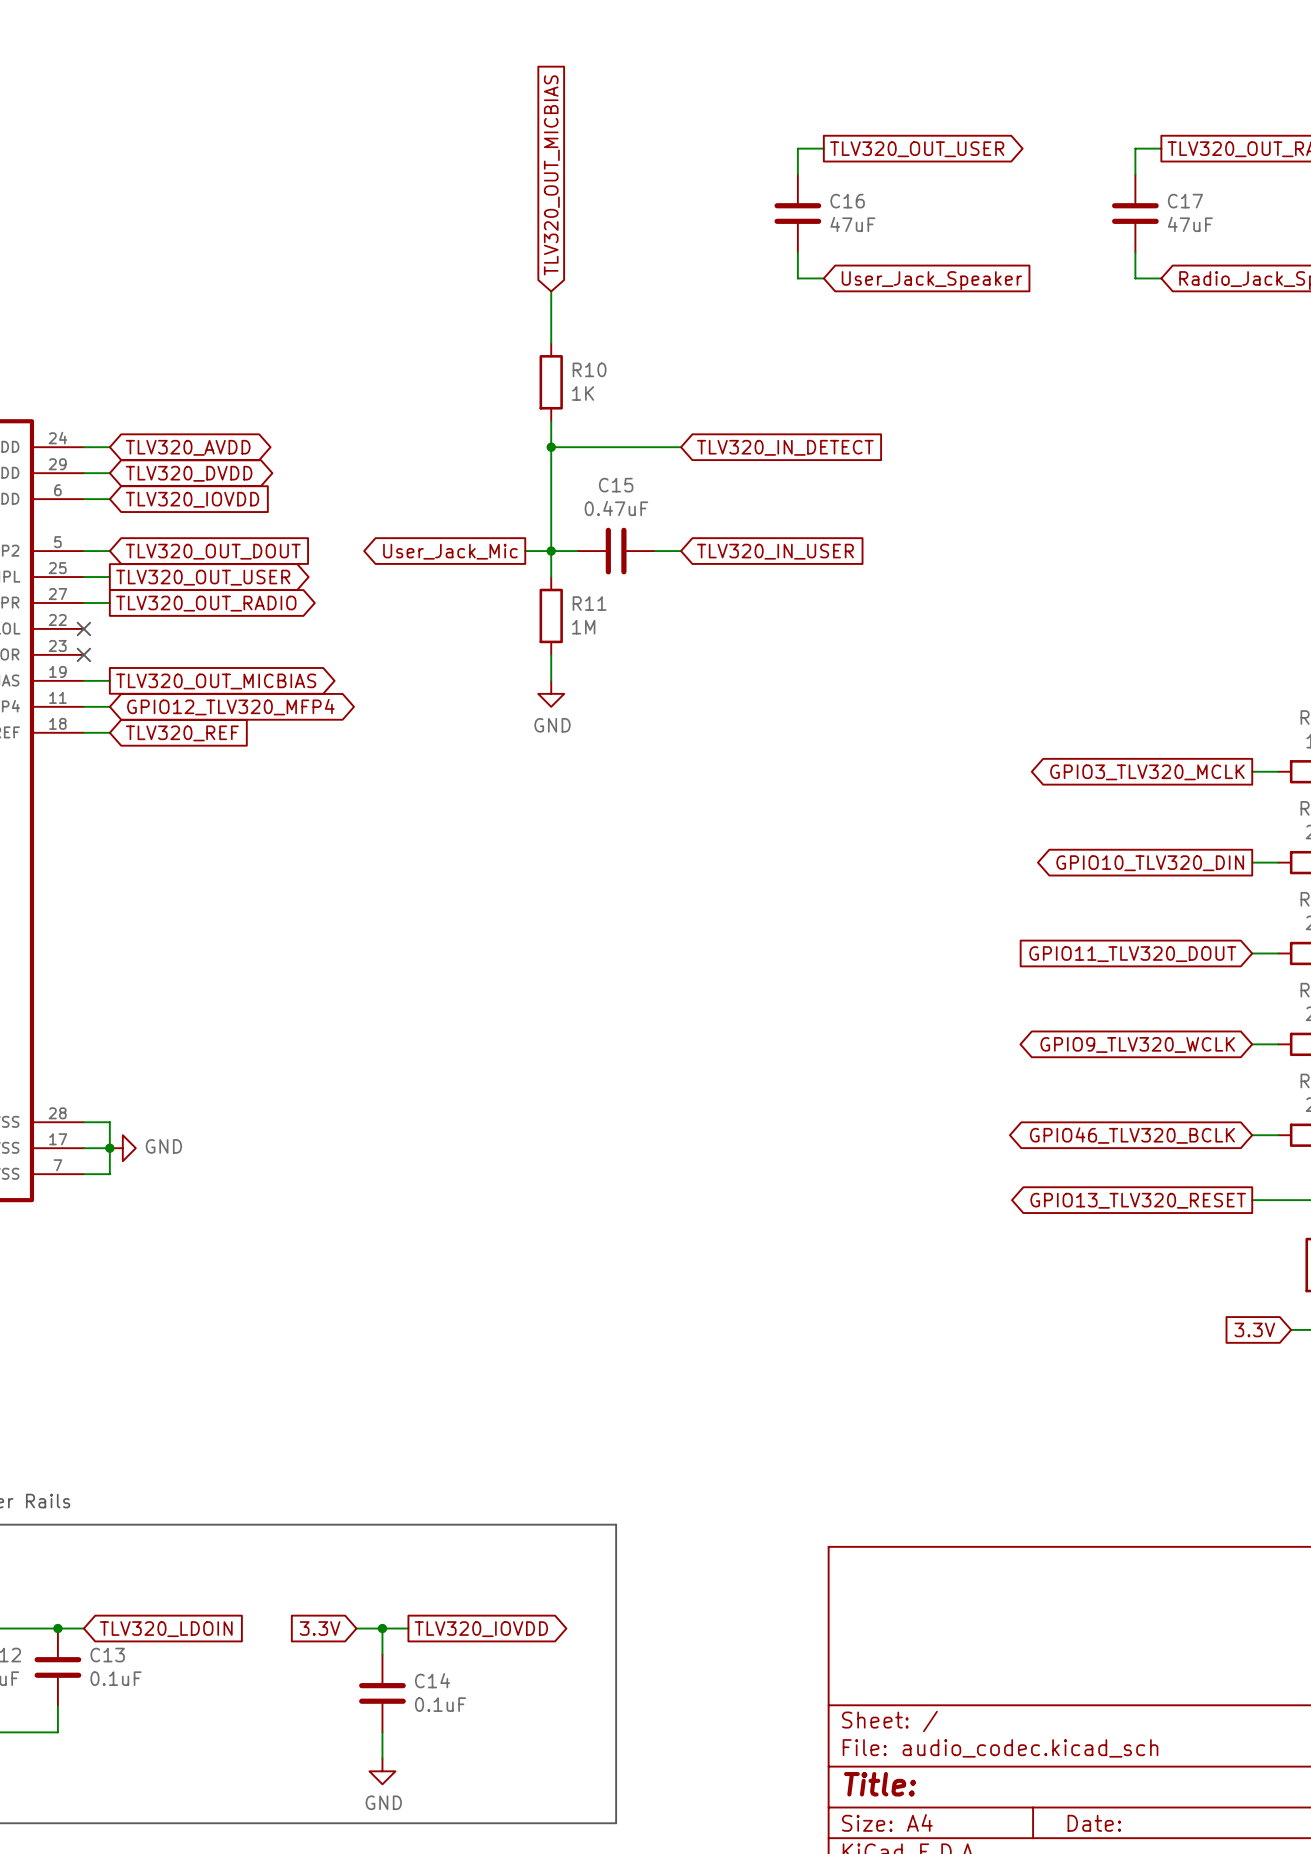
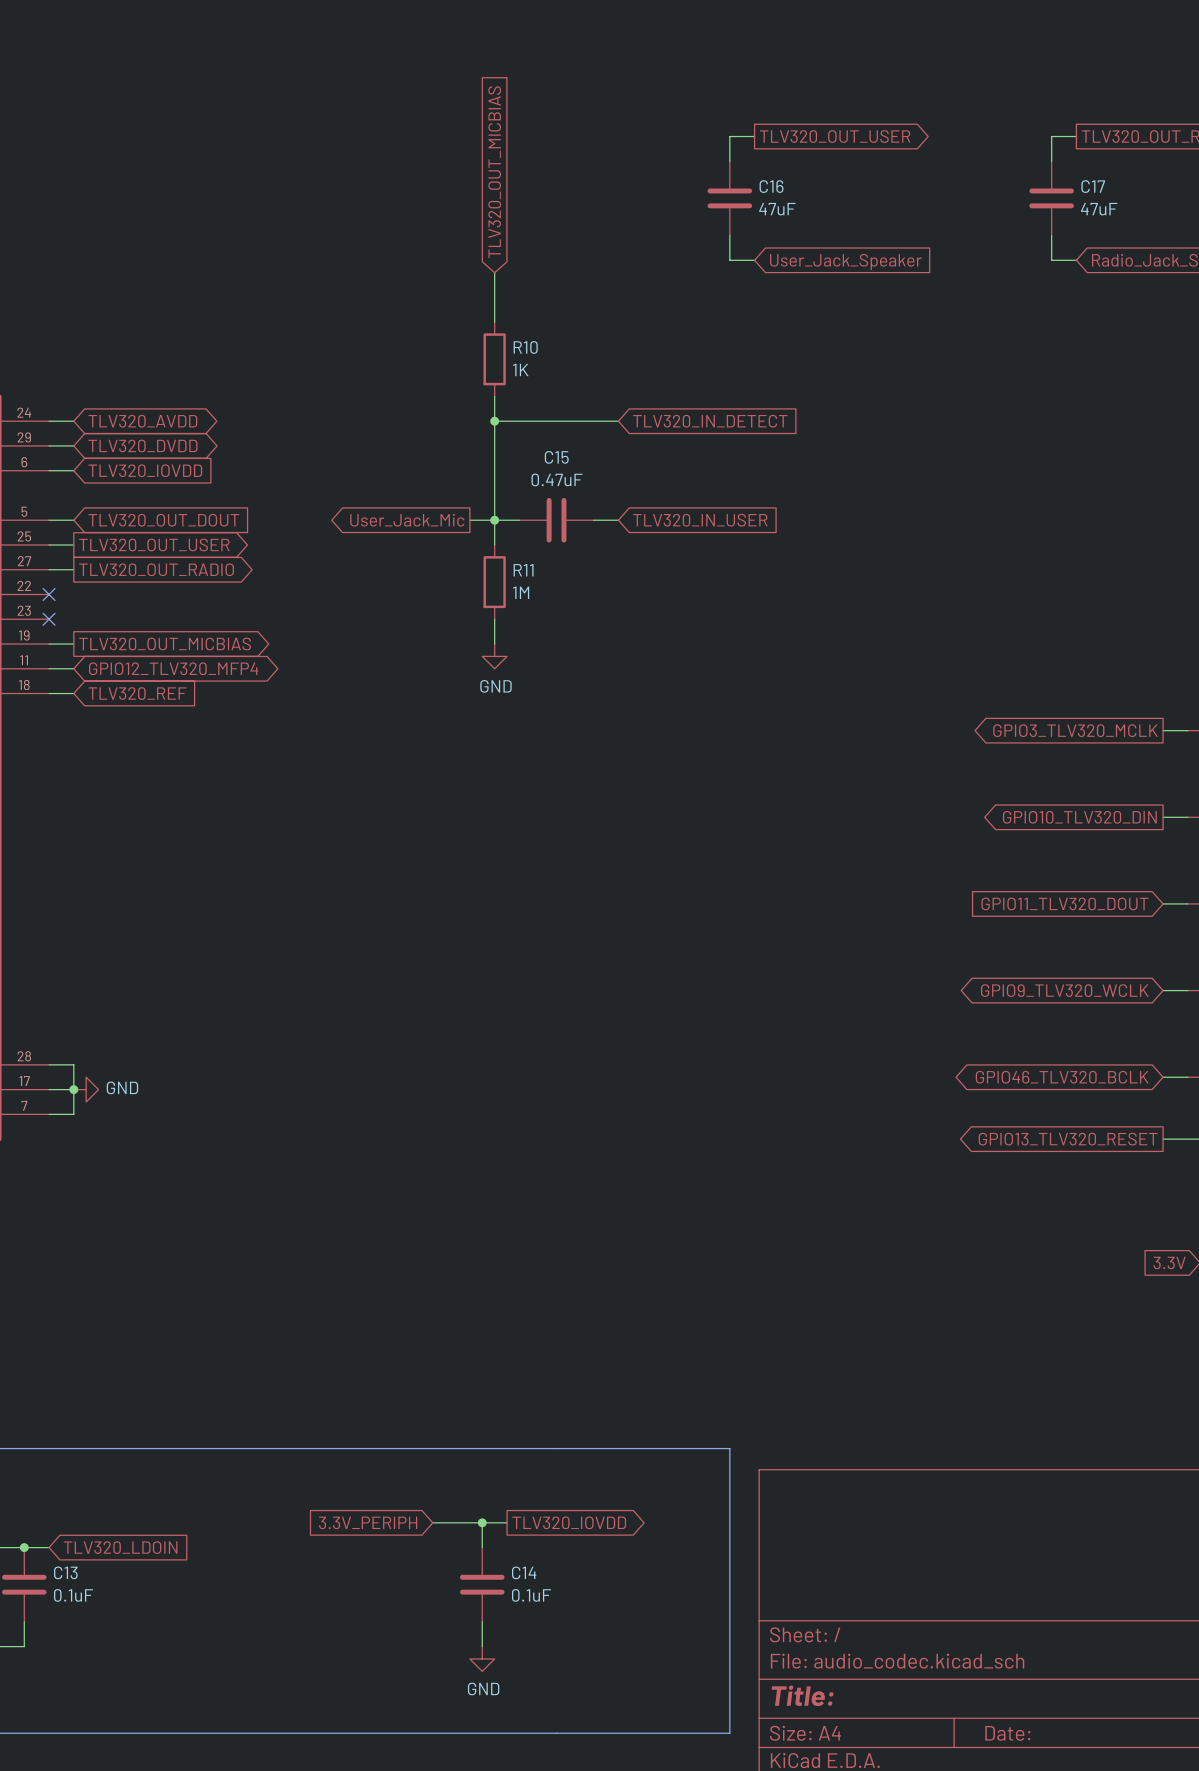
line: (616, 1524) (616, 1823) -> (556, 1448) (729, 1448) (729, 1733) (556, 1733)
wire: none -> (432, 1522) (507, 1522)
junction: none -> (482, 1522)
global label: none -> 3.3V_PERIPH (368, 1522)
global label: 3.3V (320, 1628) -> none
wire: (356, 1628) (408, 1628) -> none
wire: (382, 1628) (382, 1654) -> (482, 1522) (482, 1547)
junction: (382, 1628) -> none
global label position: TLV320_IOVDD (481, 1629) -> TLV320_IOVDD (569, 1522)
C14 position: (382, 1693) -> (482, 1584)
wire: (382, 1732) (382, 1758) -> (482, 1621) (482, 1646)
power symbol position: GND (382, 1771) -> GND (482, 1658)

